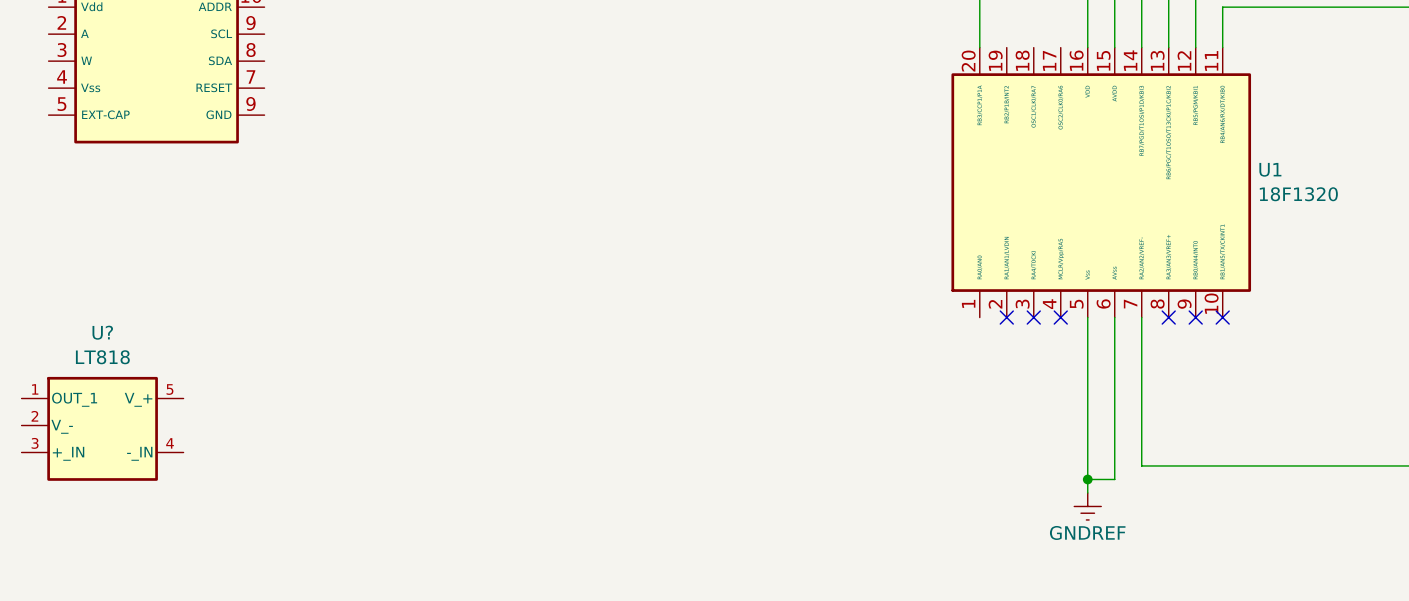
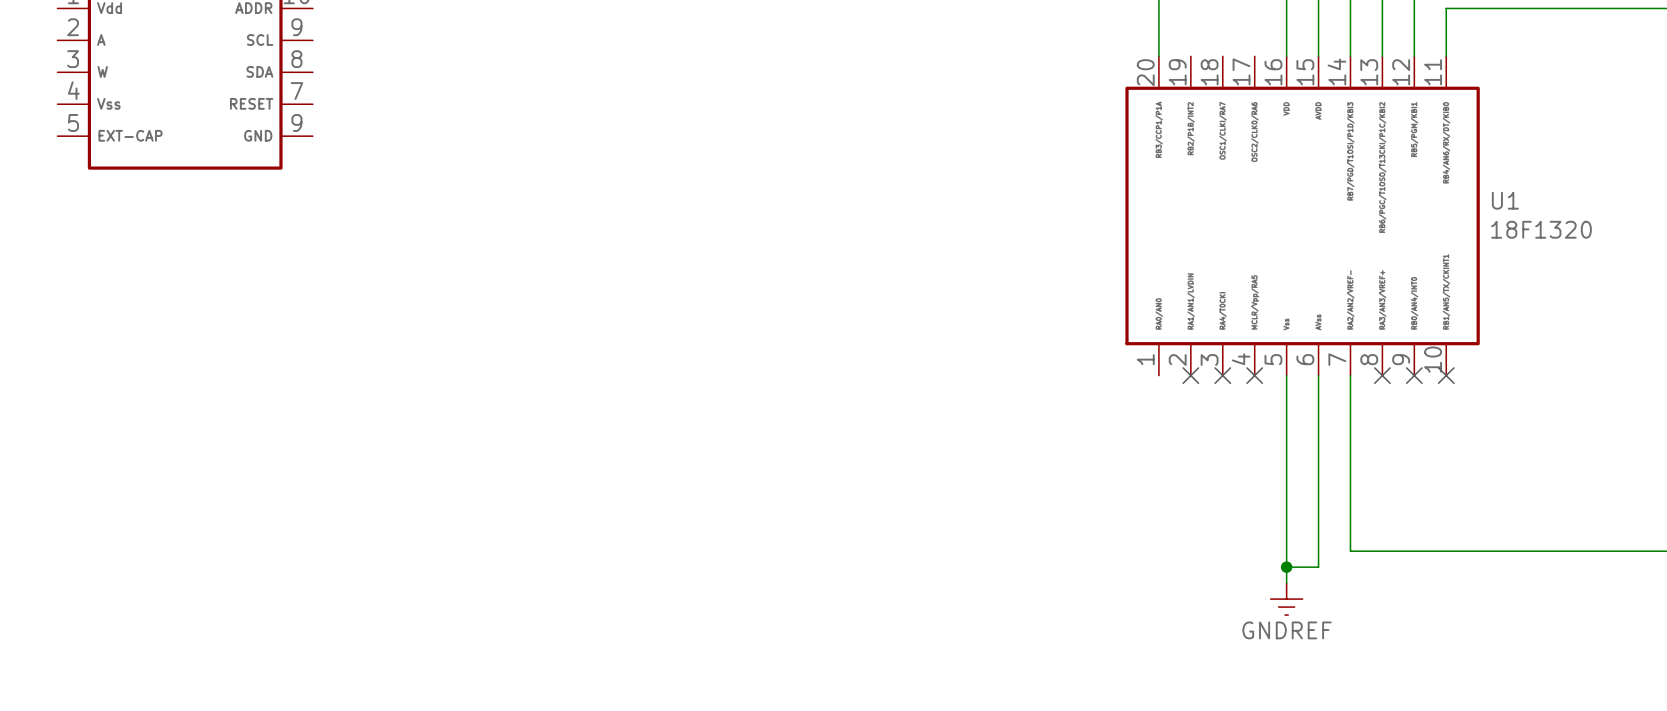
U?: LT818 (102, 428) -> none

